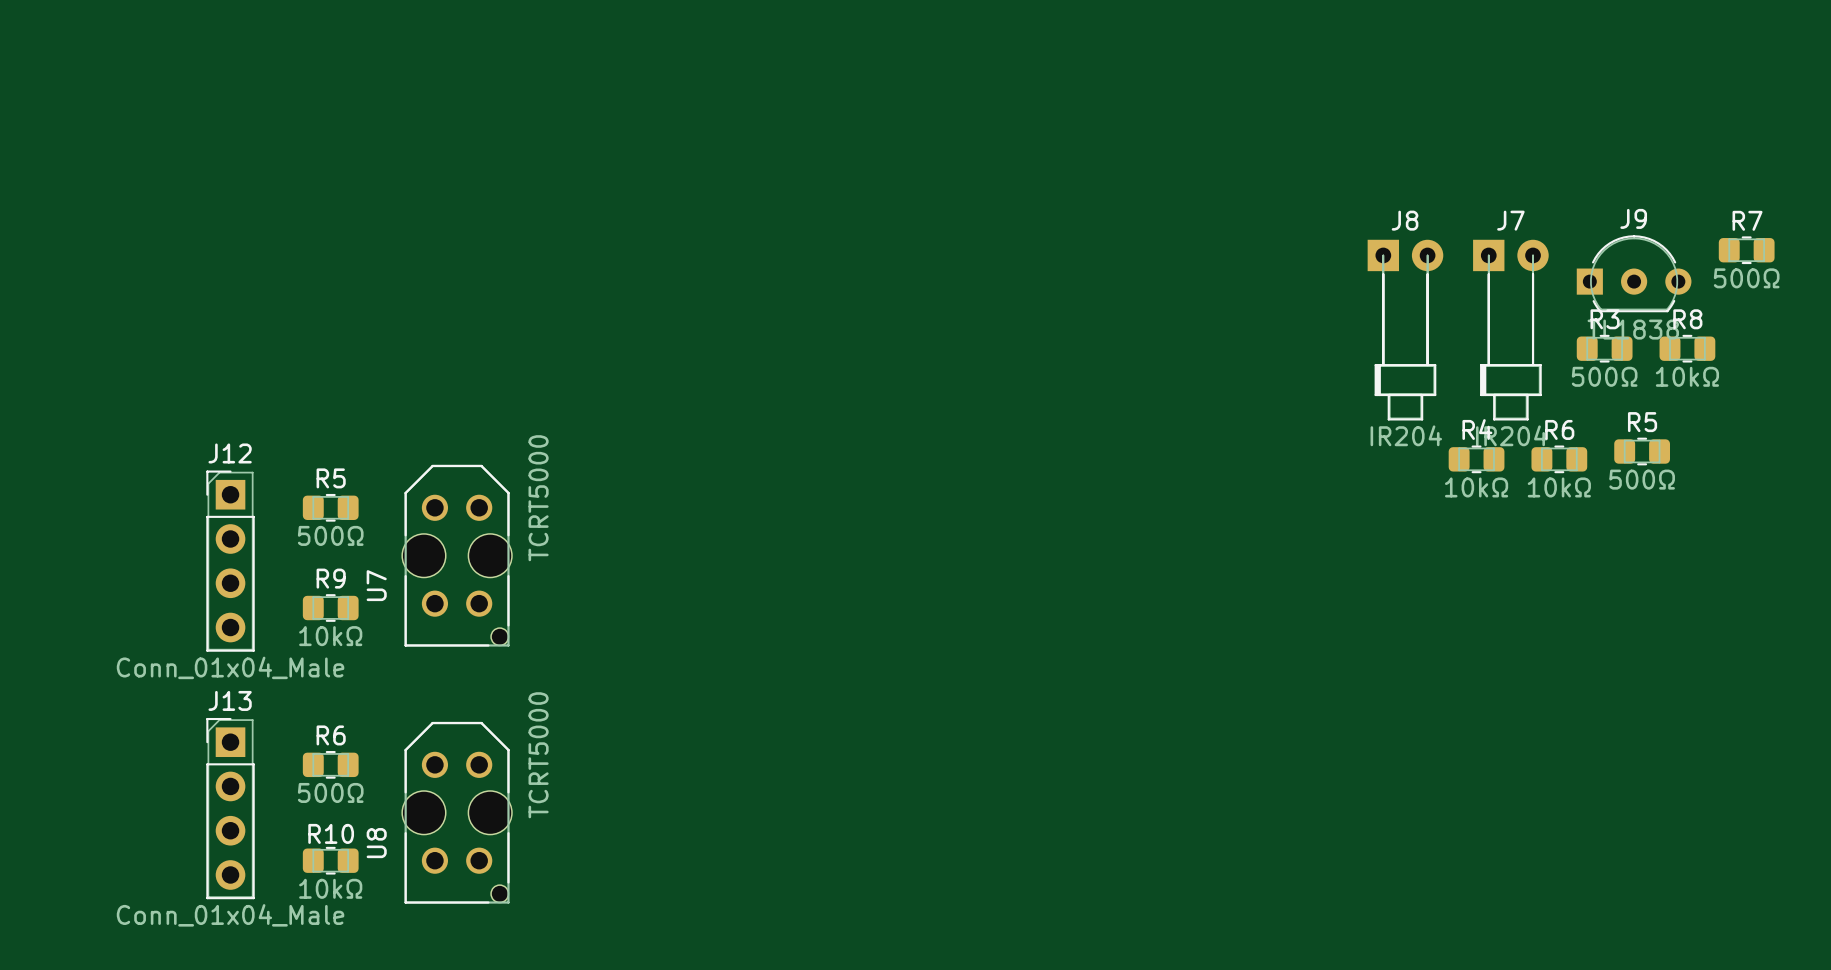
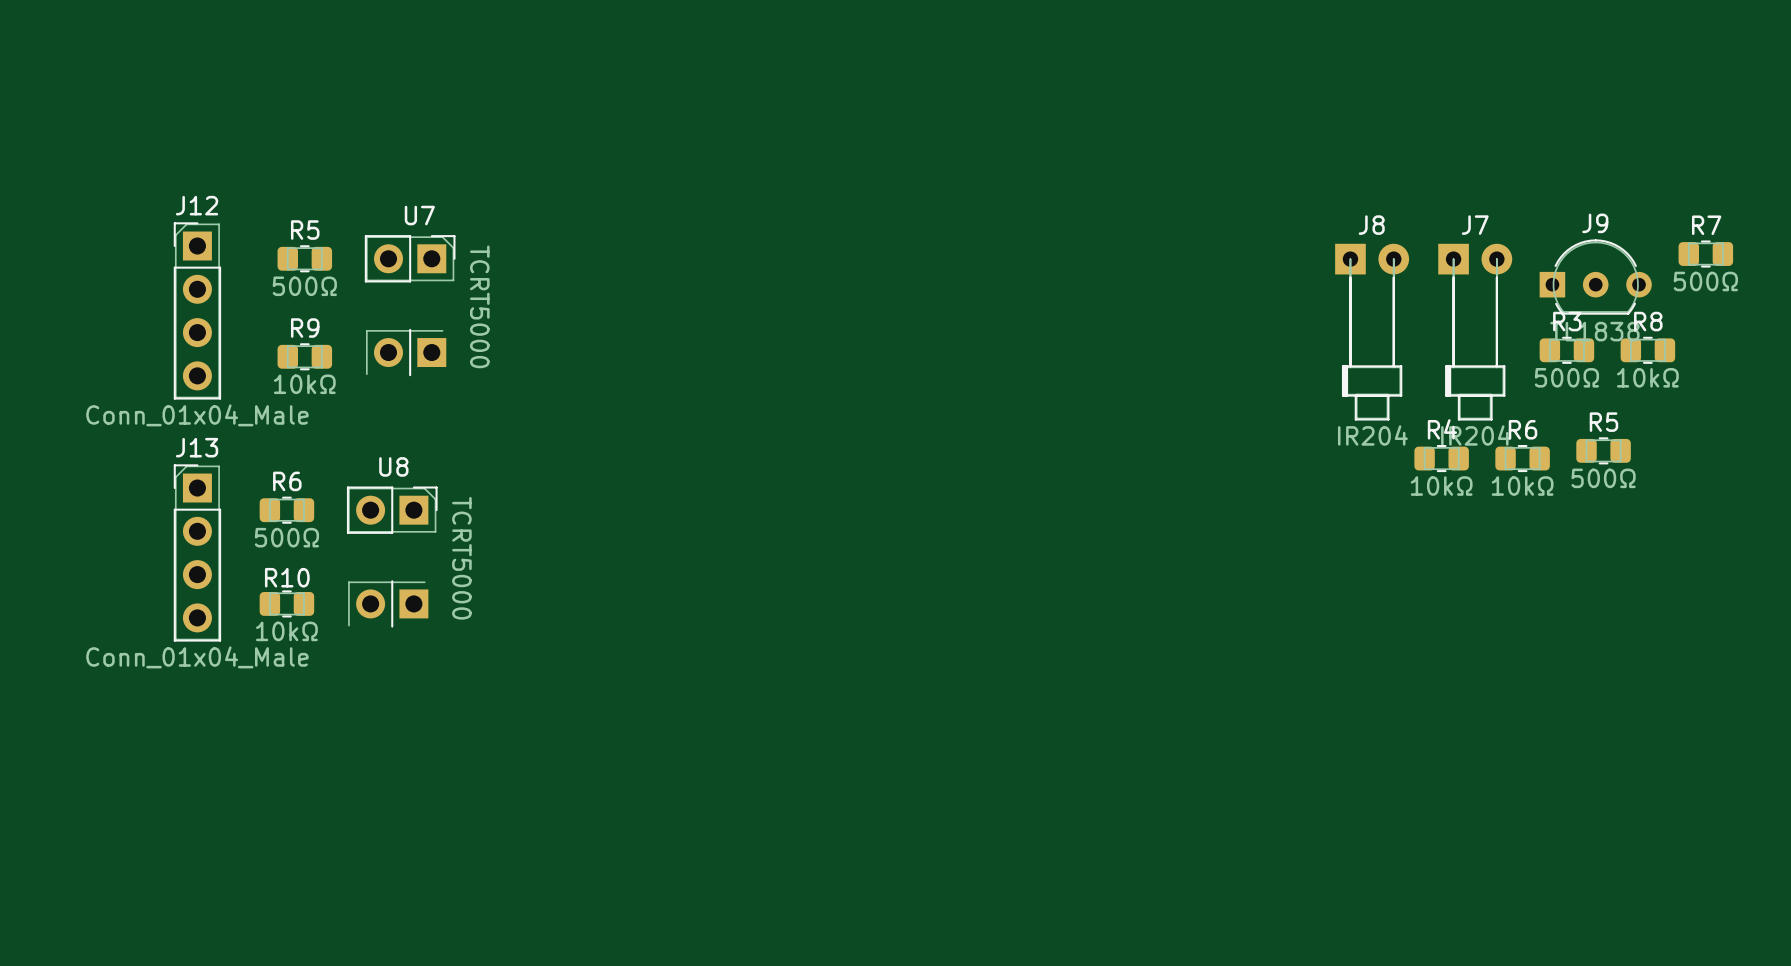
U7 footprint: [402, 464, 512, 647] -> [364, 235, 456, 377]
U7 value position: TCRT5000 (538, 498) -> TCRT5000 (479, 306)
R5 position: (330, 507) -> (304, 258)
J12 position: (230, 561) -> (197, 310)
U7 name position: U7 (376, 585) -> U7 (419, 215)
R9 position: (330, 608) -> (304, 356)
U8 footprint: [402, 721, 512, 904] -> [346, 486, 438, 628]
U8 value position: TCRT5000 (538, 755) -> TCRT5000 (461, 558)
R6 position: (330, 764) -> (286, 510)
J13 position: (230, 808) -> (197, 552)
U8 name position: U8 (376, 843) -> U8 (393, 466)
R10 position: (330, 860) -> (286, 603)

